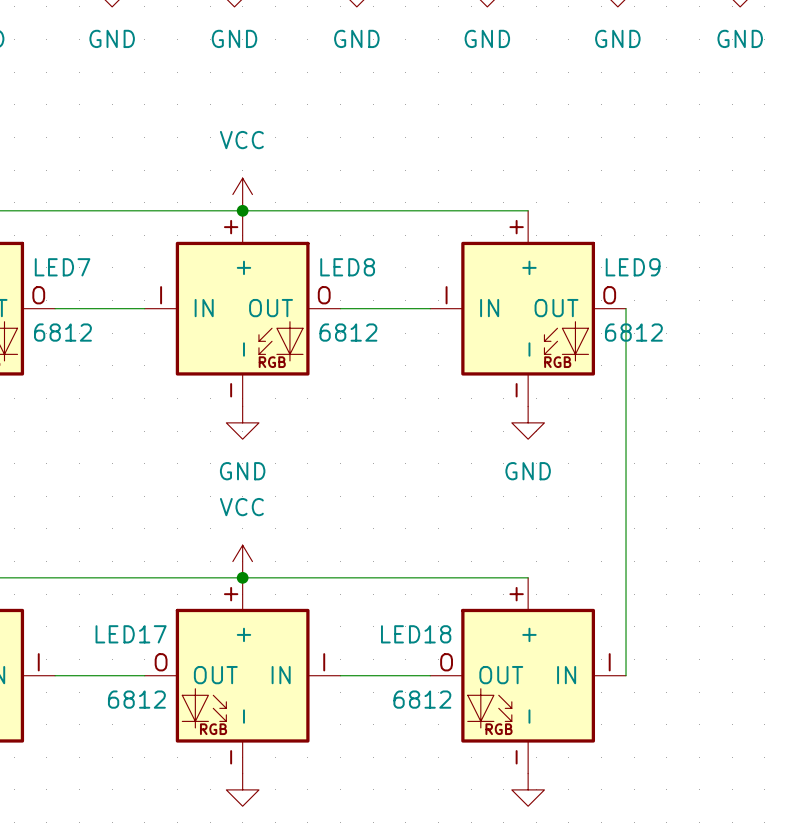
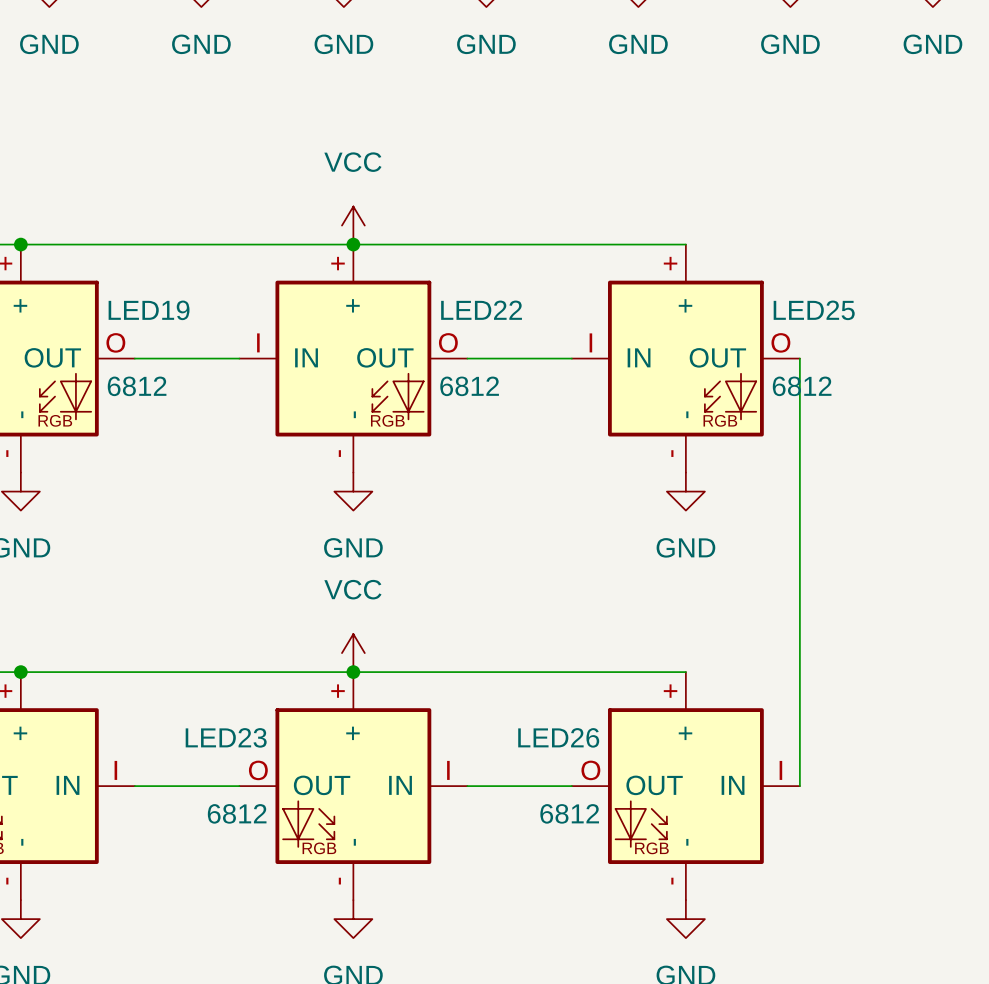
LED7 name: LED7 (62, 267) -> LED19 (149, 310)
LED8 name: LED8 (347, 267) -> LED22 (481, 310)
LED9 name: LED9 (633, 267) -> LED25 (814, 310)
LED17 name: LED17 (131, 634) -> LED23 (226, 737)
LED18 name: LED18 (416, 634) -> LED26 (558, 737)

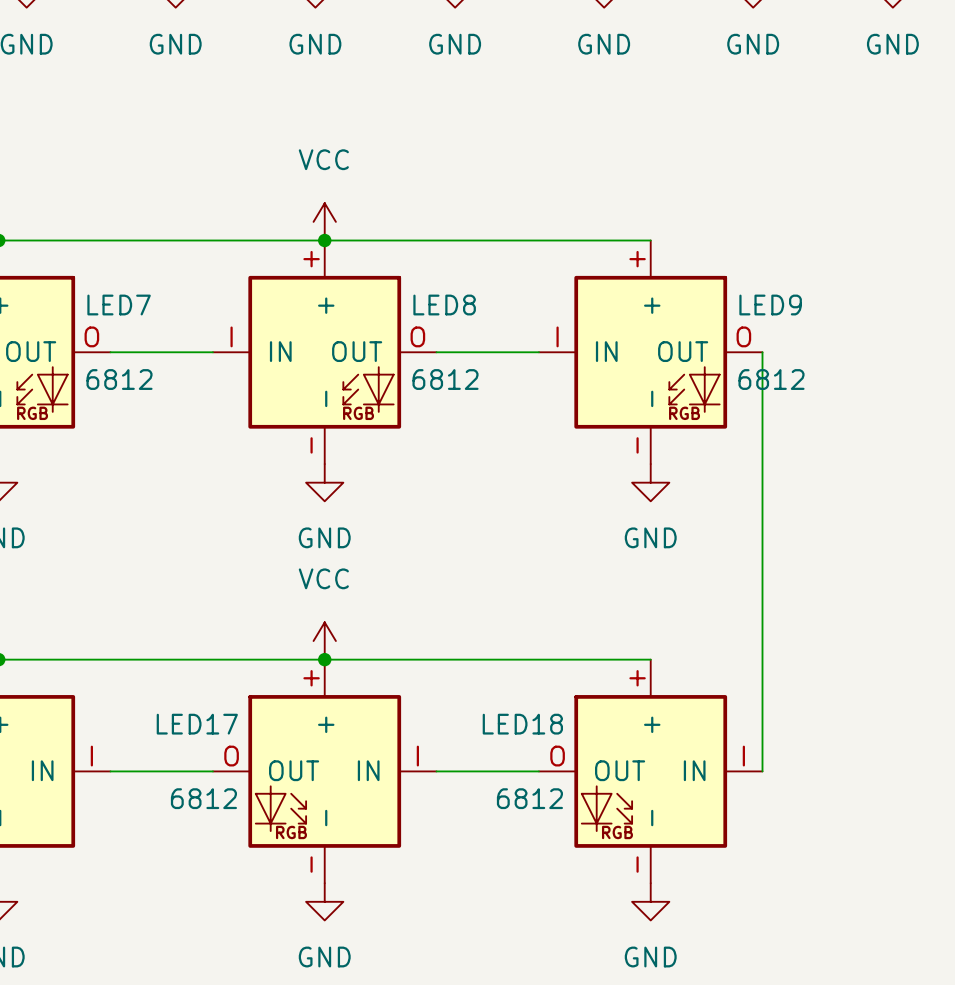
LED19 name: LED19 (149, 310) -> LED7 (119, 305)
LED22 name: LED22 (481, 310) -> LED8 (444, 305)
LED25 name: LED25 (814, 310) -> LED9 (770, 305)
LED23 name: LED23 (226, 737) -> LED17 (197, 724)
LED26 name: LED26 (558, 737) -> LED18 (522, 724)

